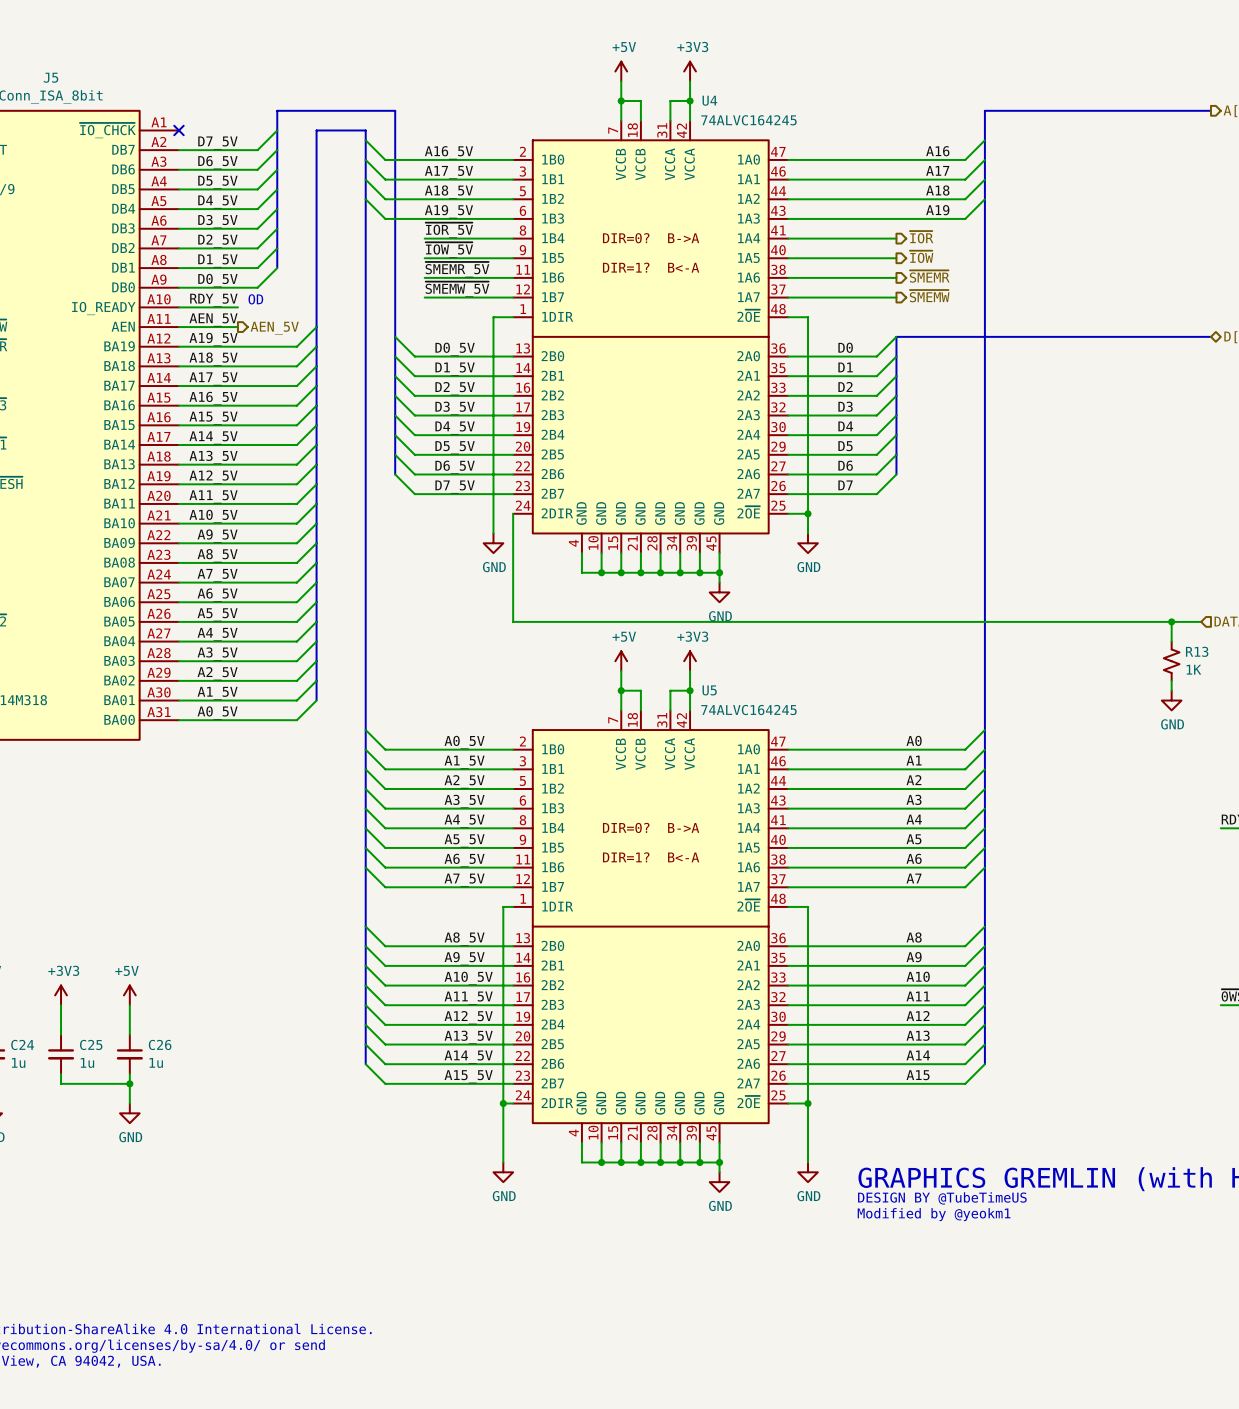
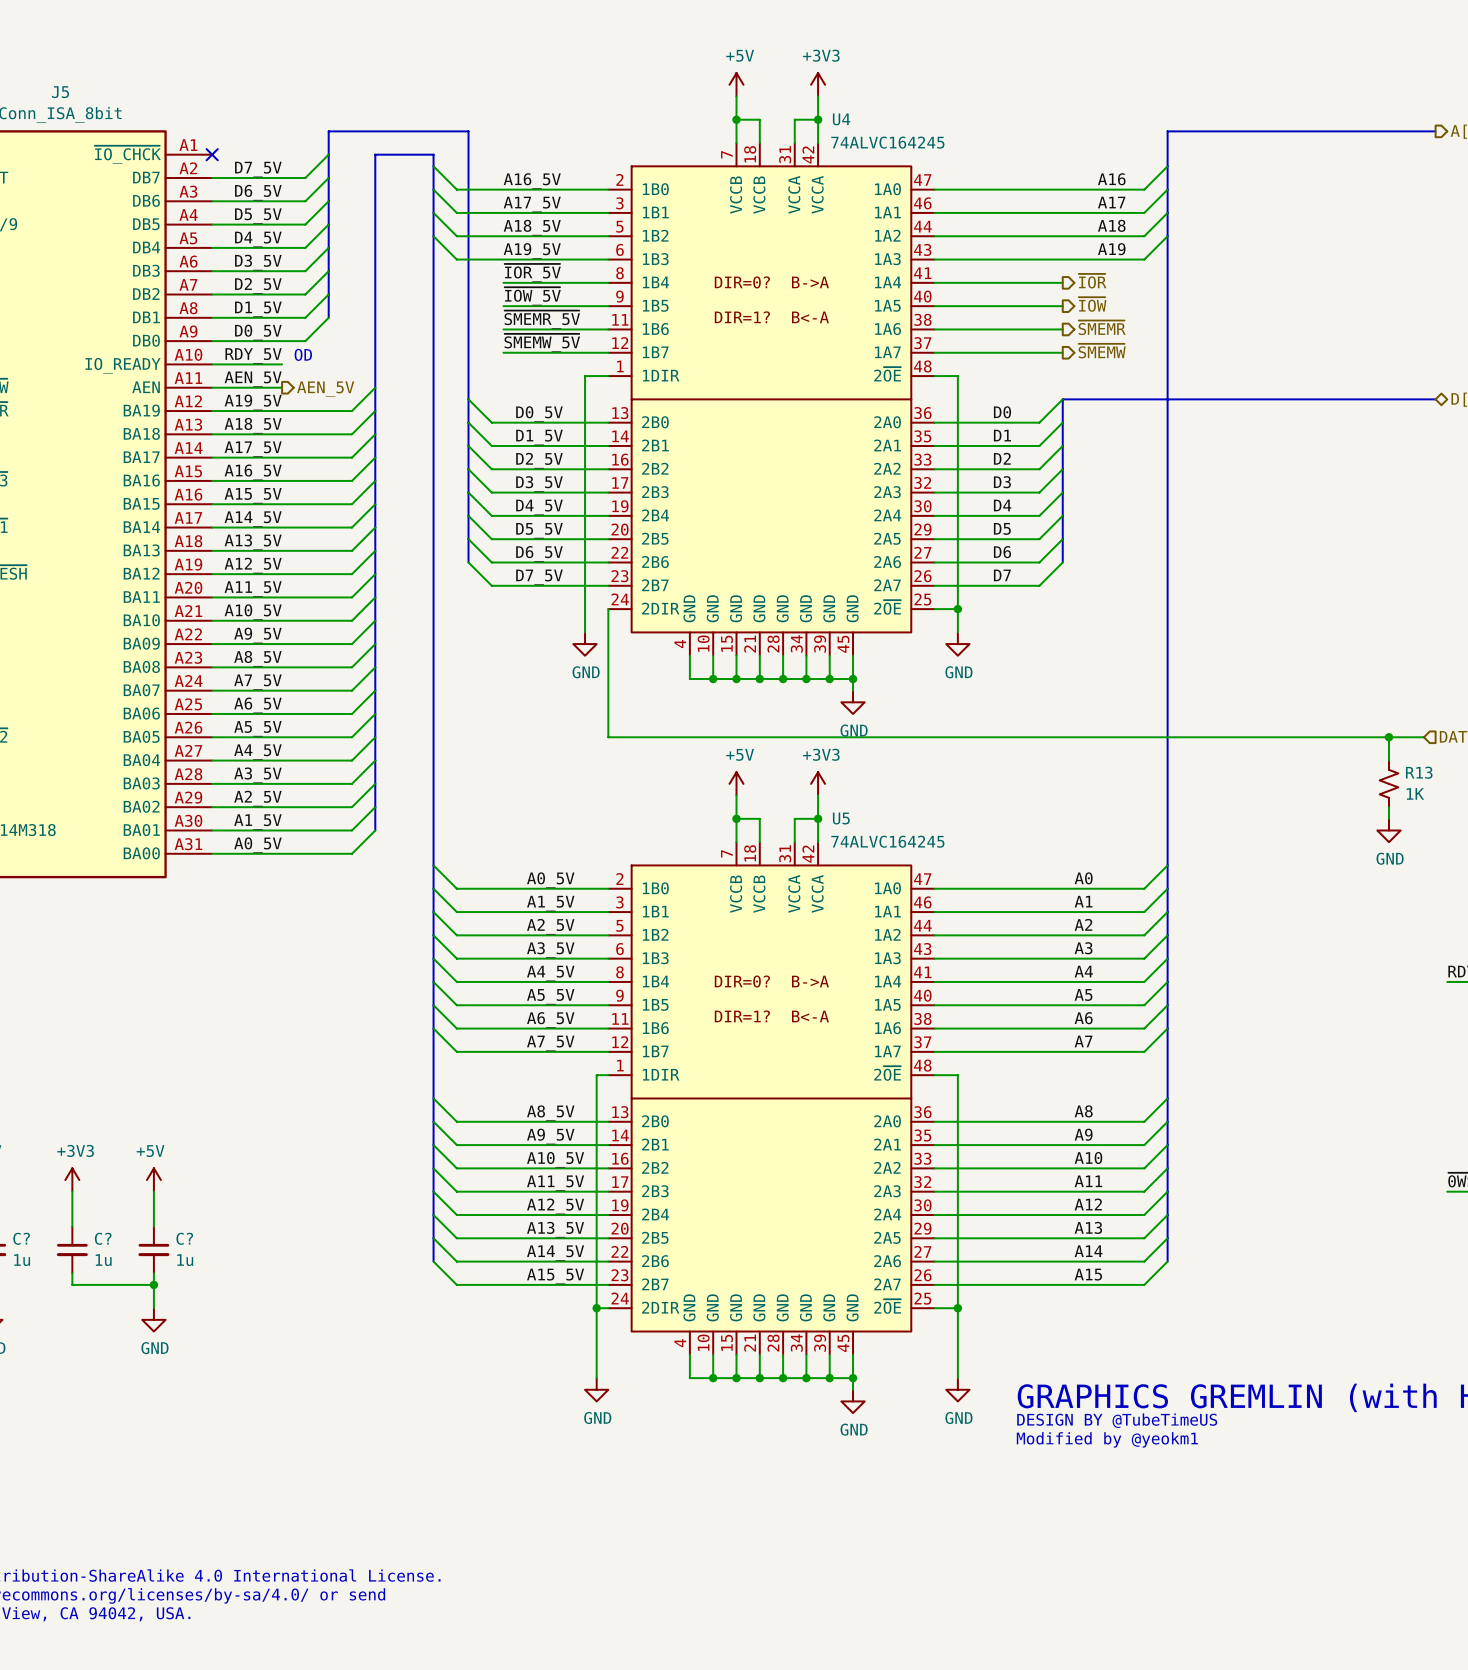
C24 name: C24 (22, 1044) -> C? (21, 1238)
C25 name: C25 (91, 1044) -> C? (103, 1238)
C26 name: C26 (160, 1044) -> C? (184, 1238)

